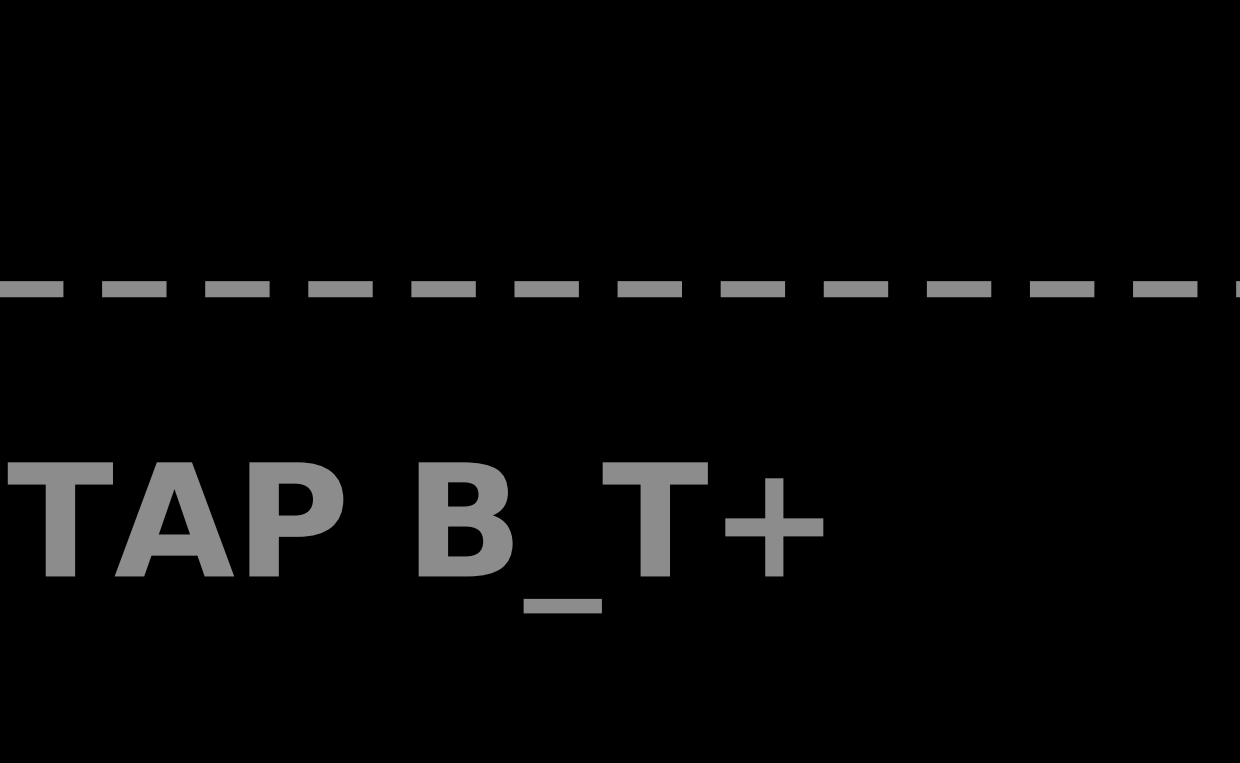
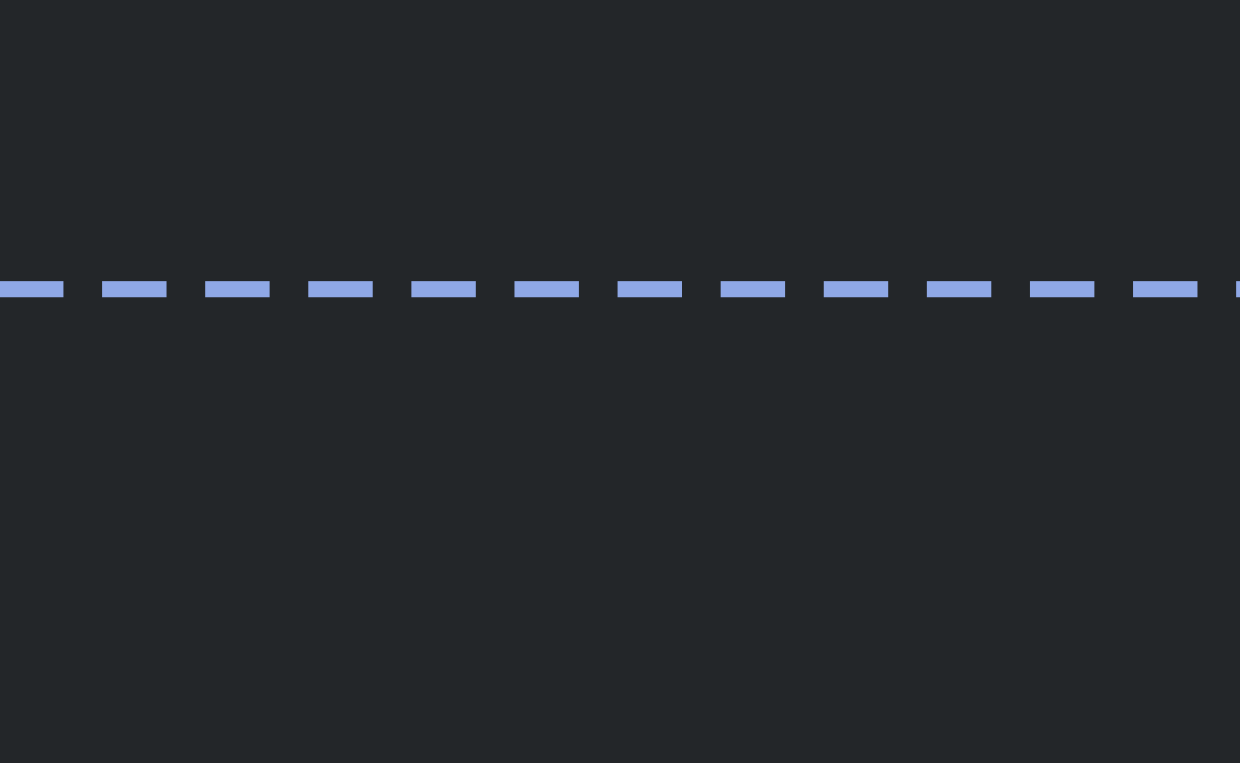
text: TAP B_T+ (415, 537) -> none

